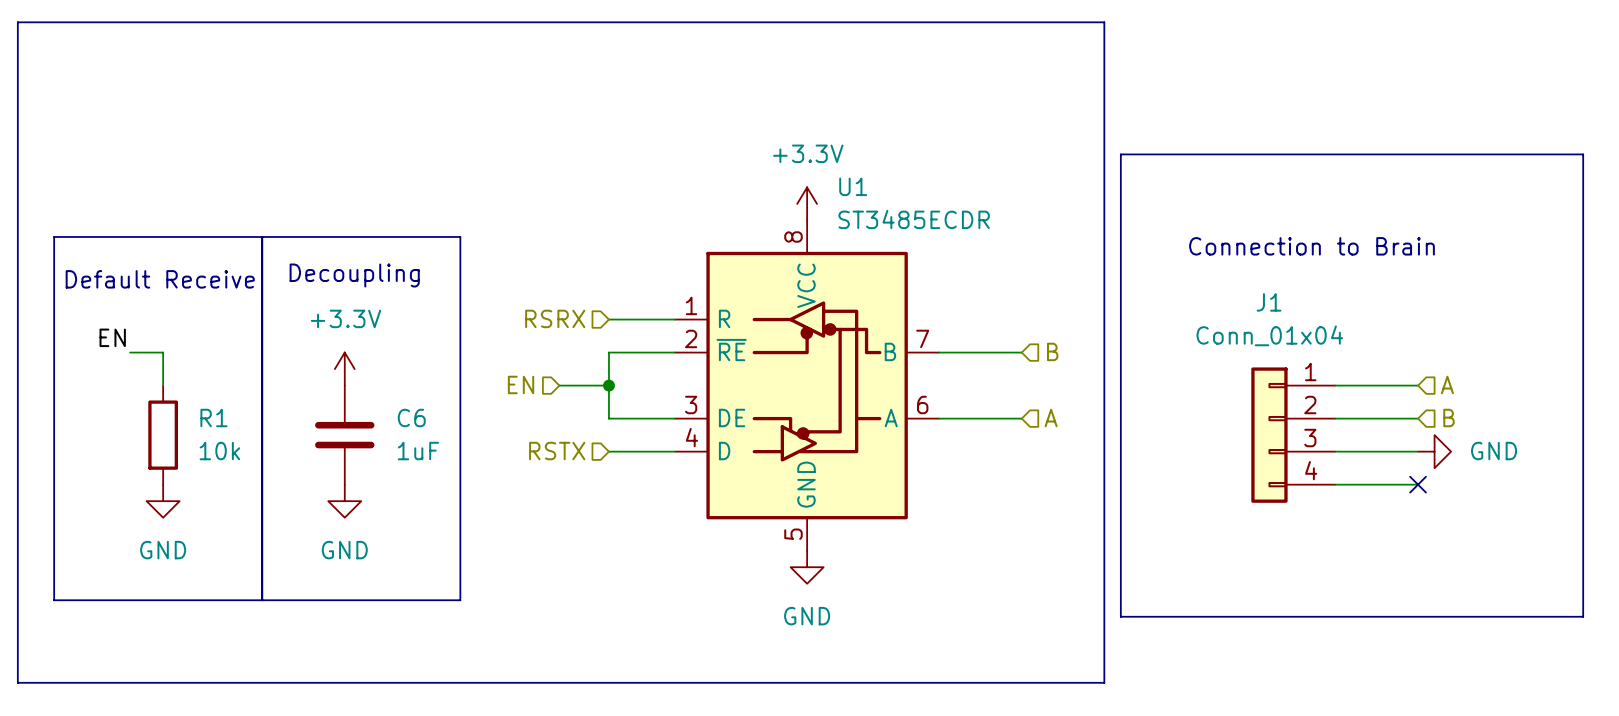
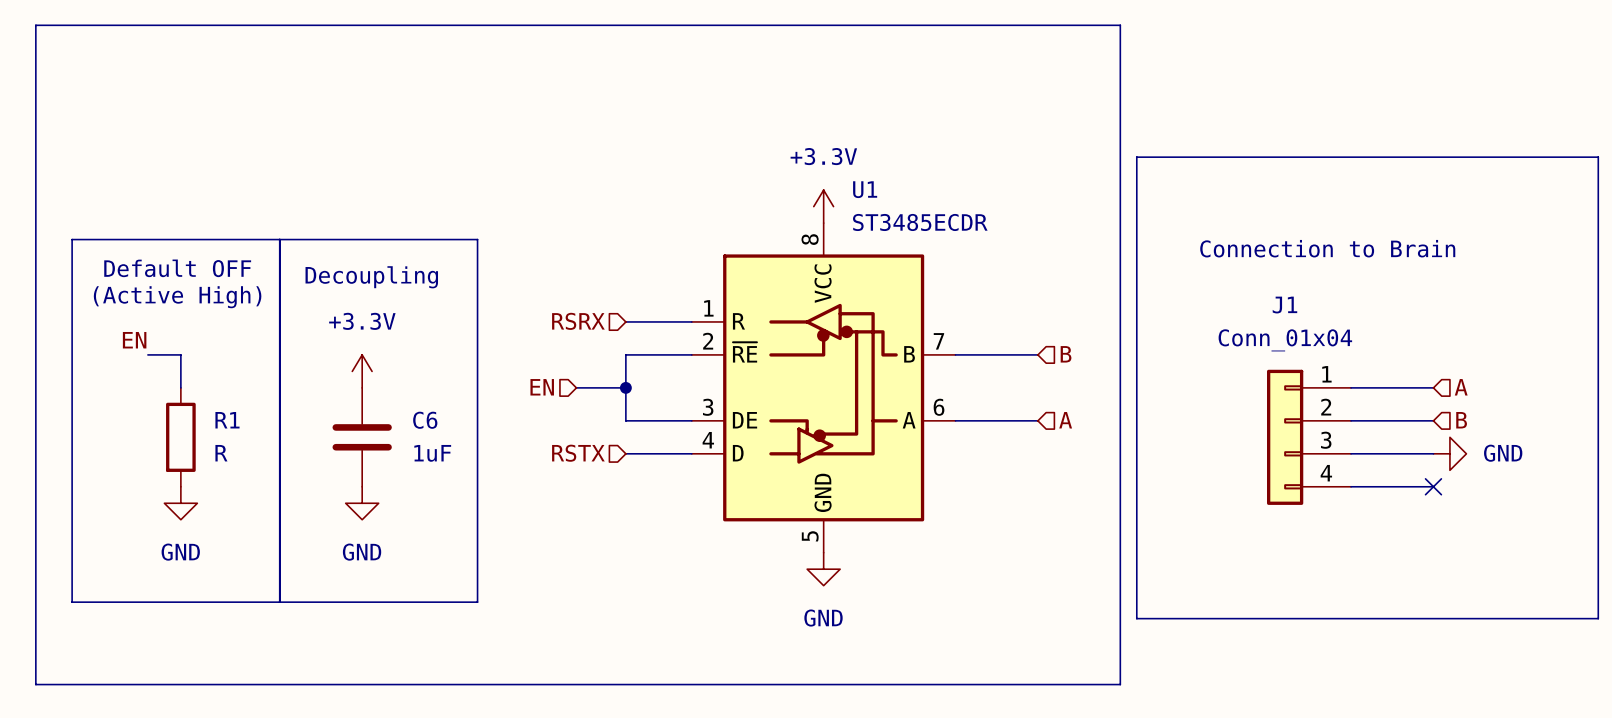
text: Default Receive (160, 279) -> Default OFF (177, 268)
text: none -> (Active High) (177, 297)
R1 value: 10k (219, 451) -> R (221, 453)

